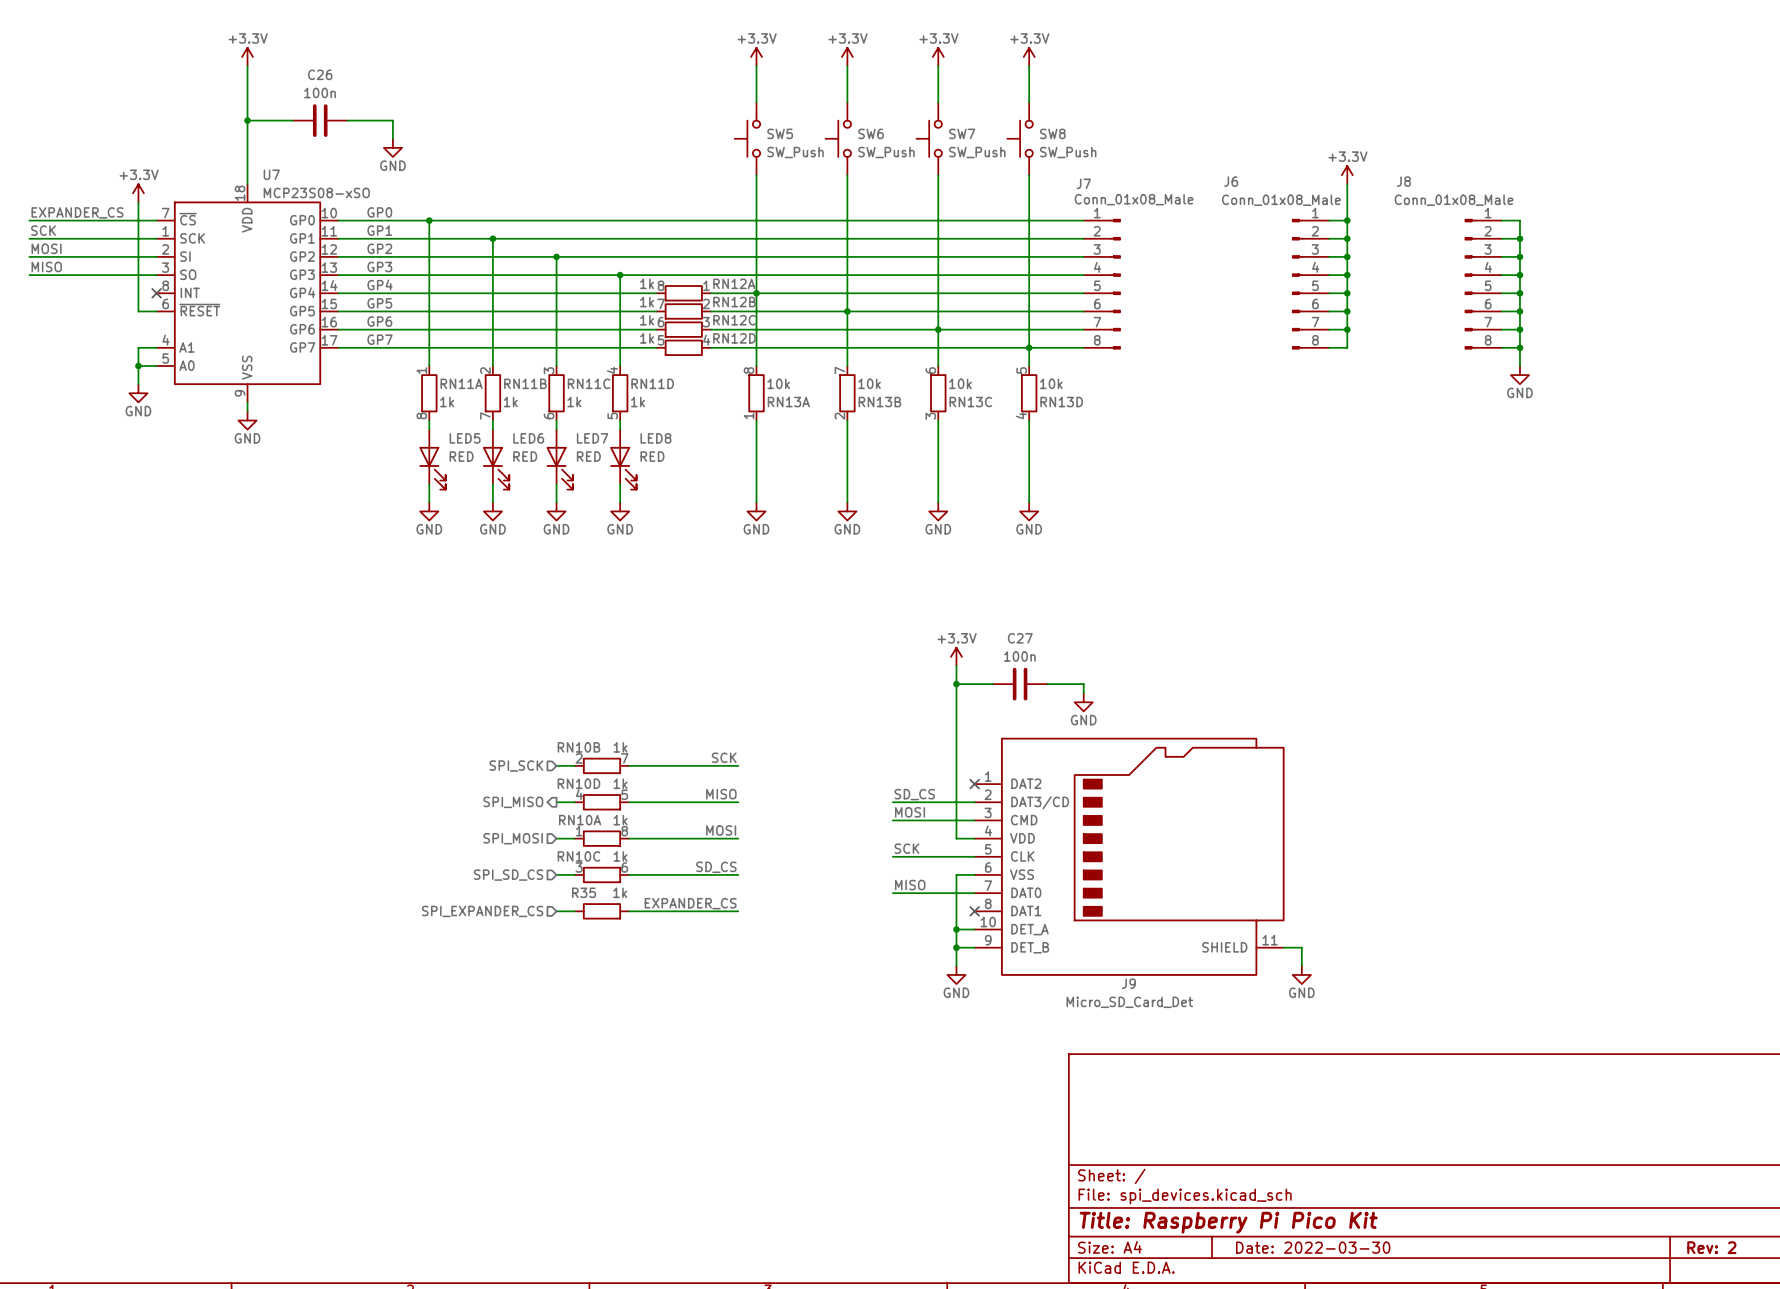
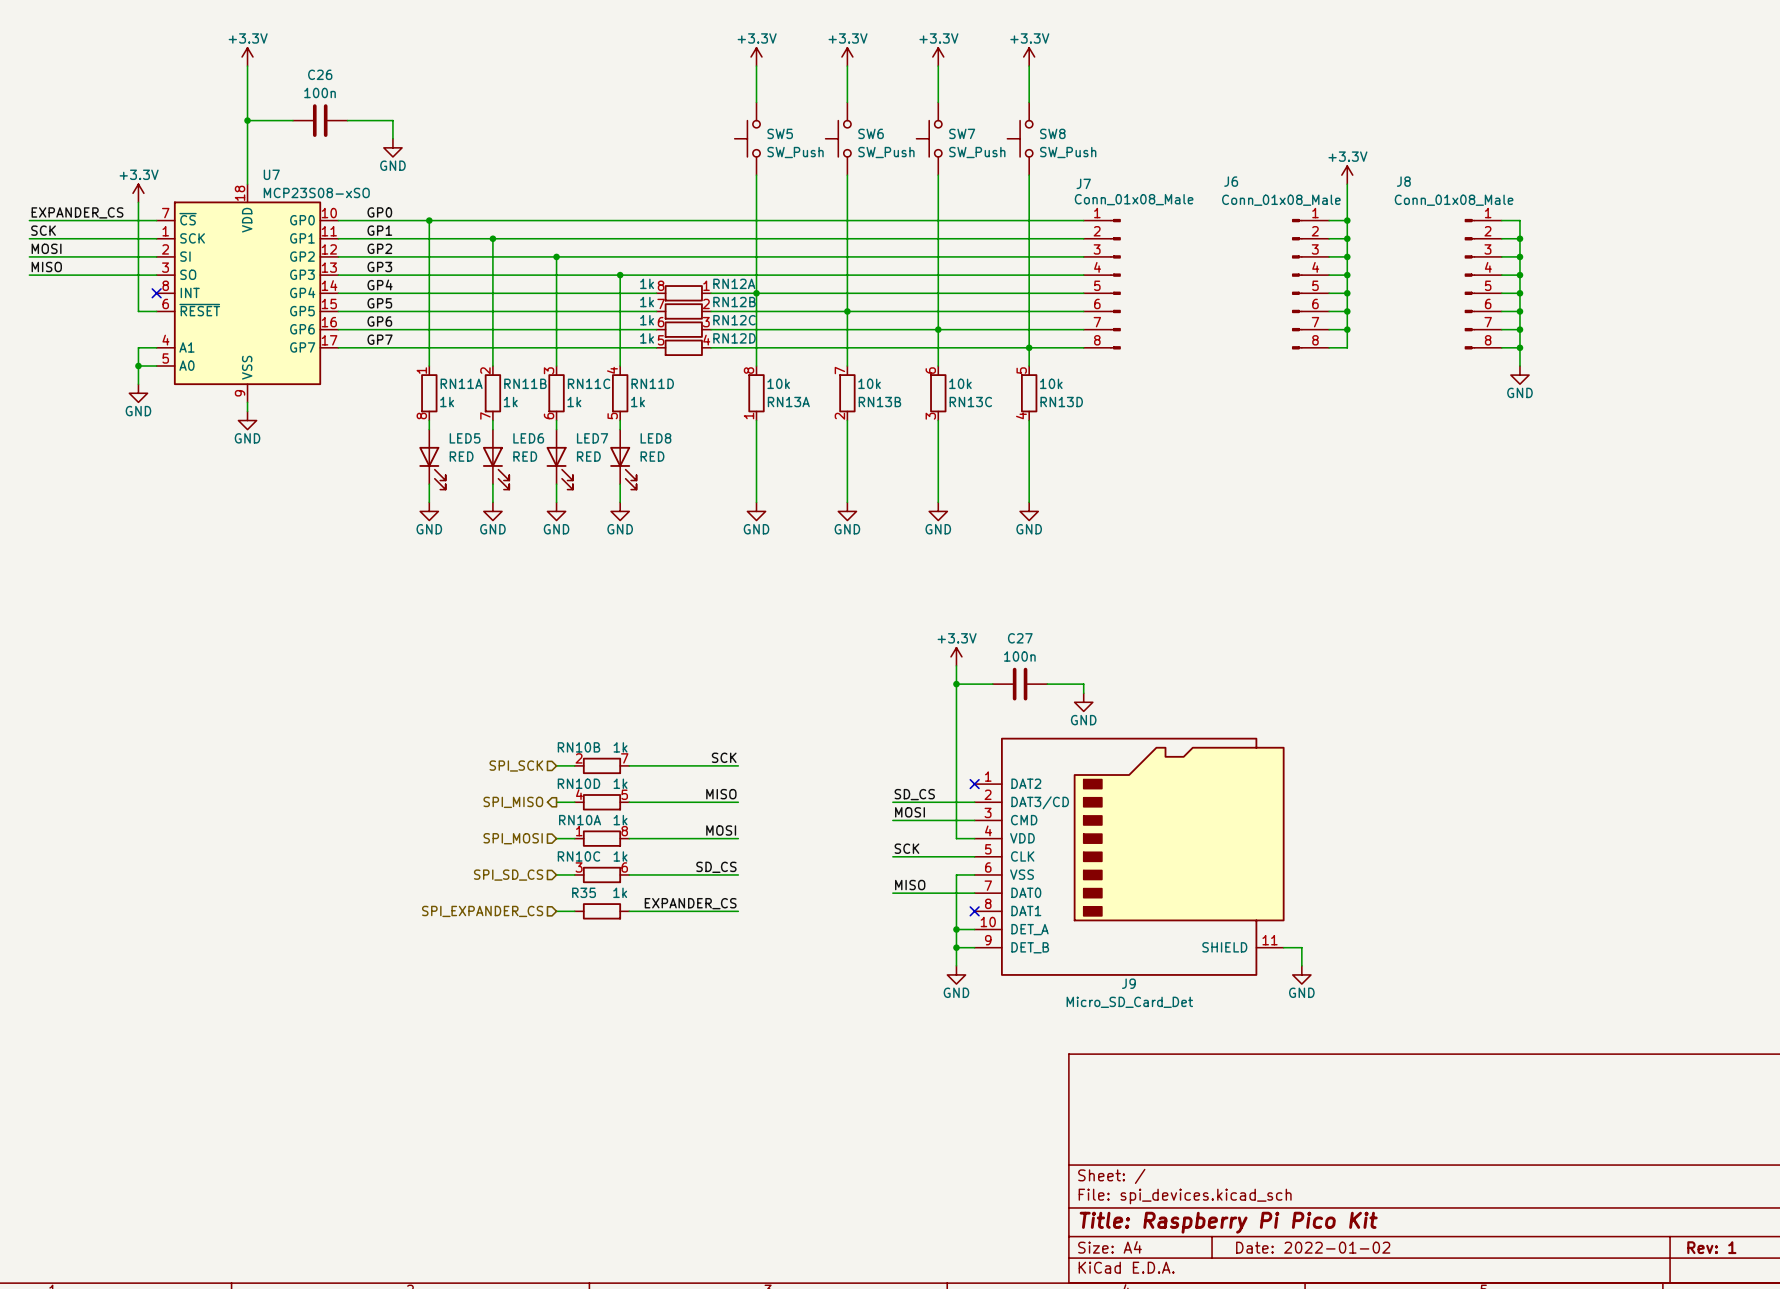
title block: Date: 2022-03-30 (1313, 1247) -> Date: 2022-01-02 (1313, 1247)
title block: Rev: 2 (1711, 1247) -> Rev: 1 (1711, 1247)

